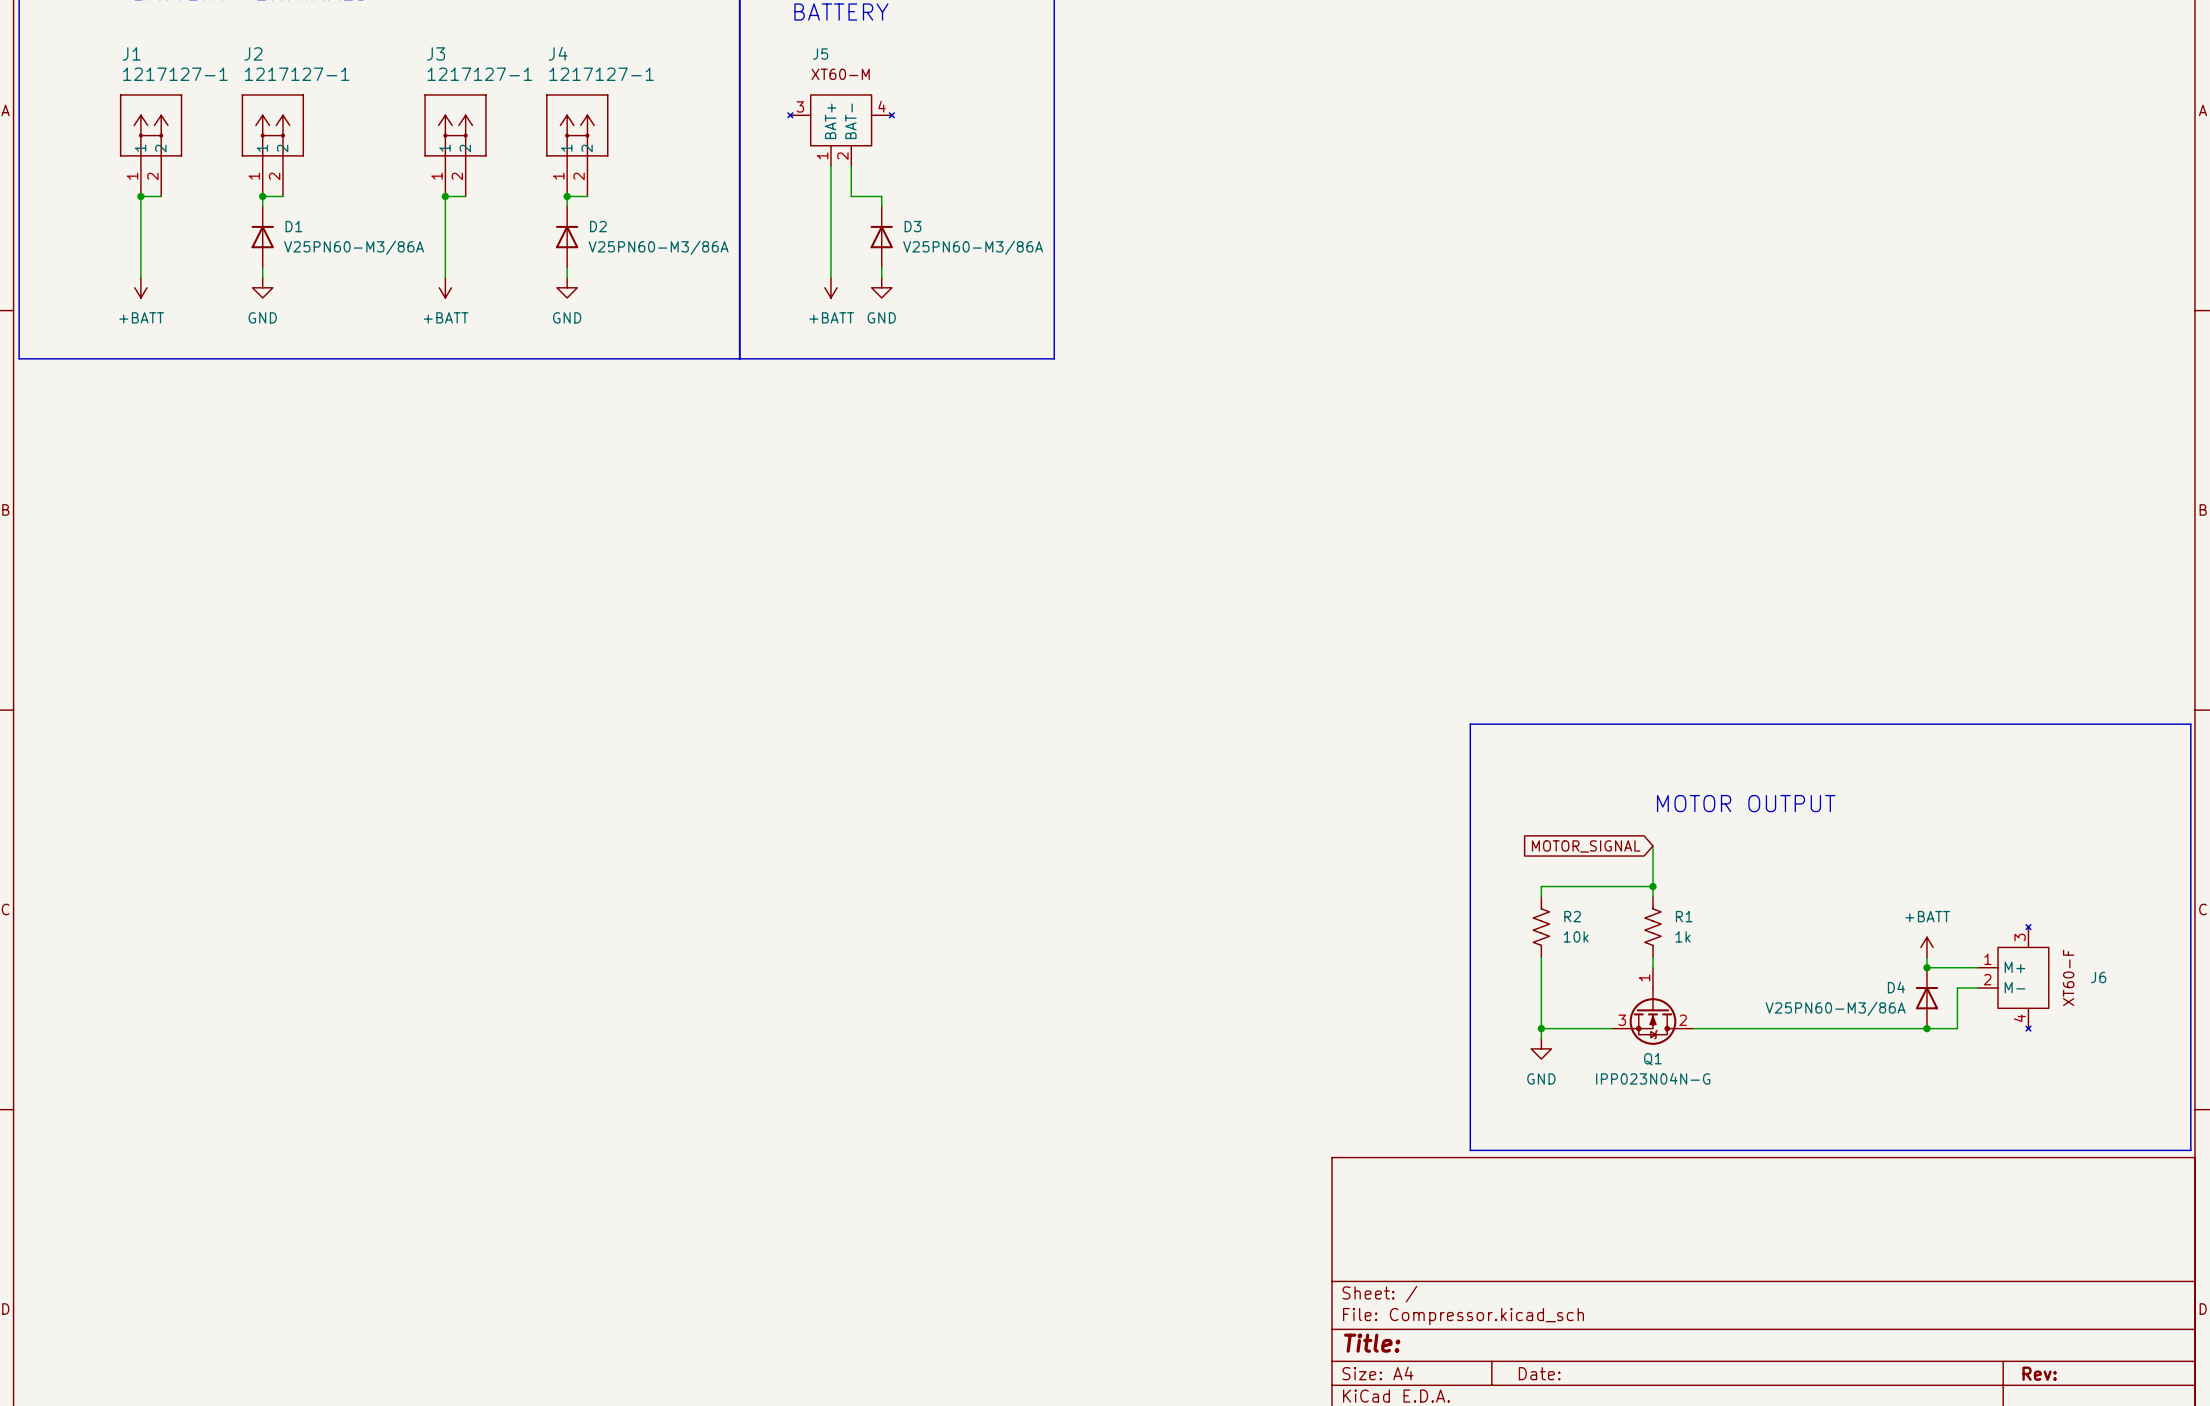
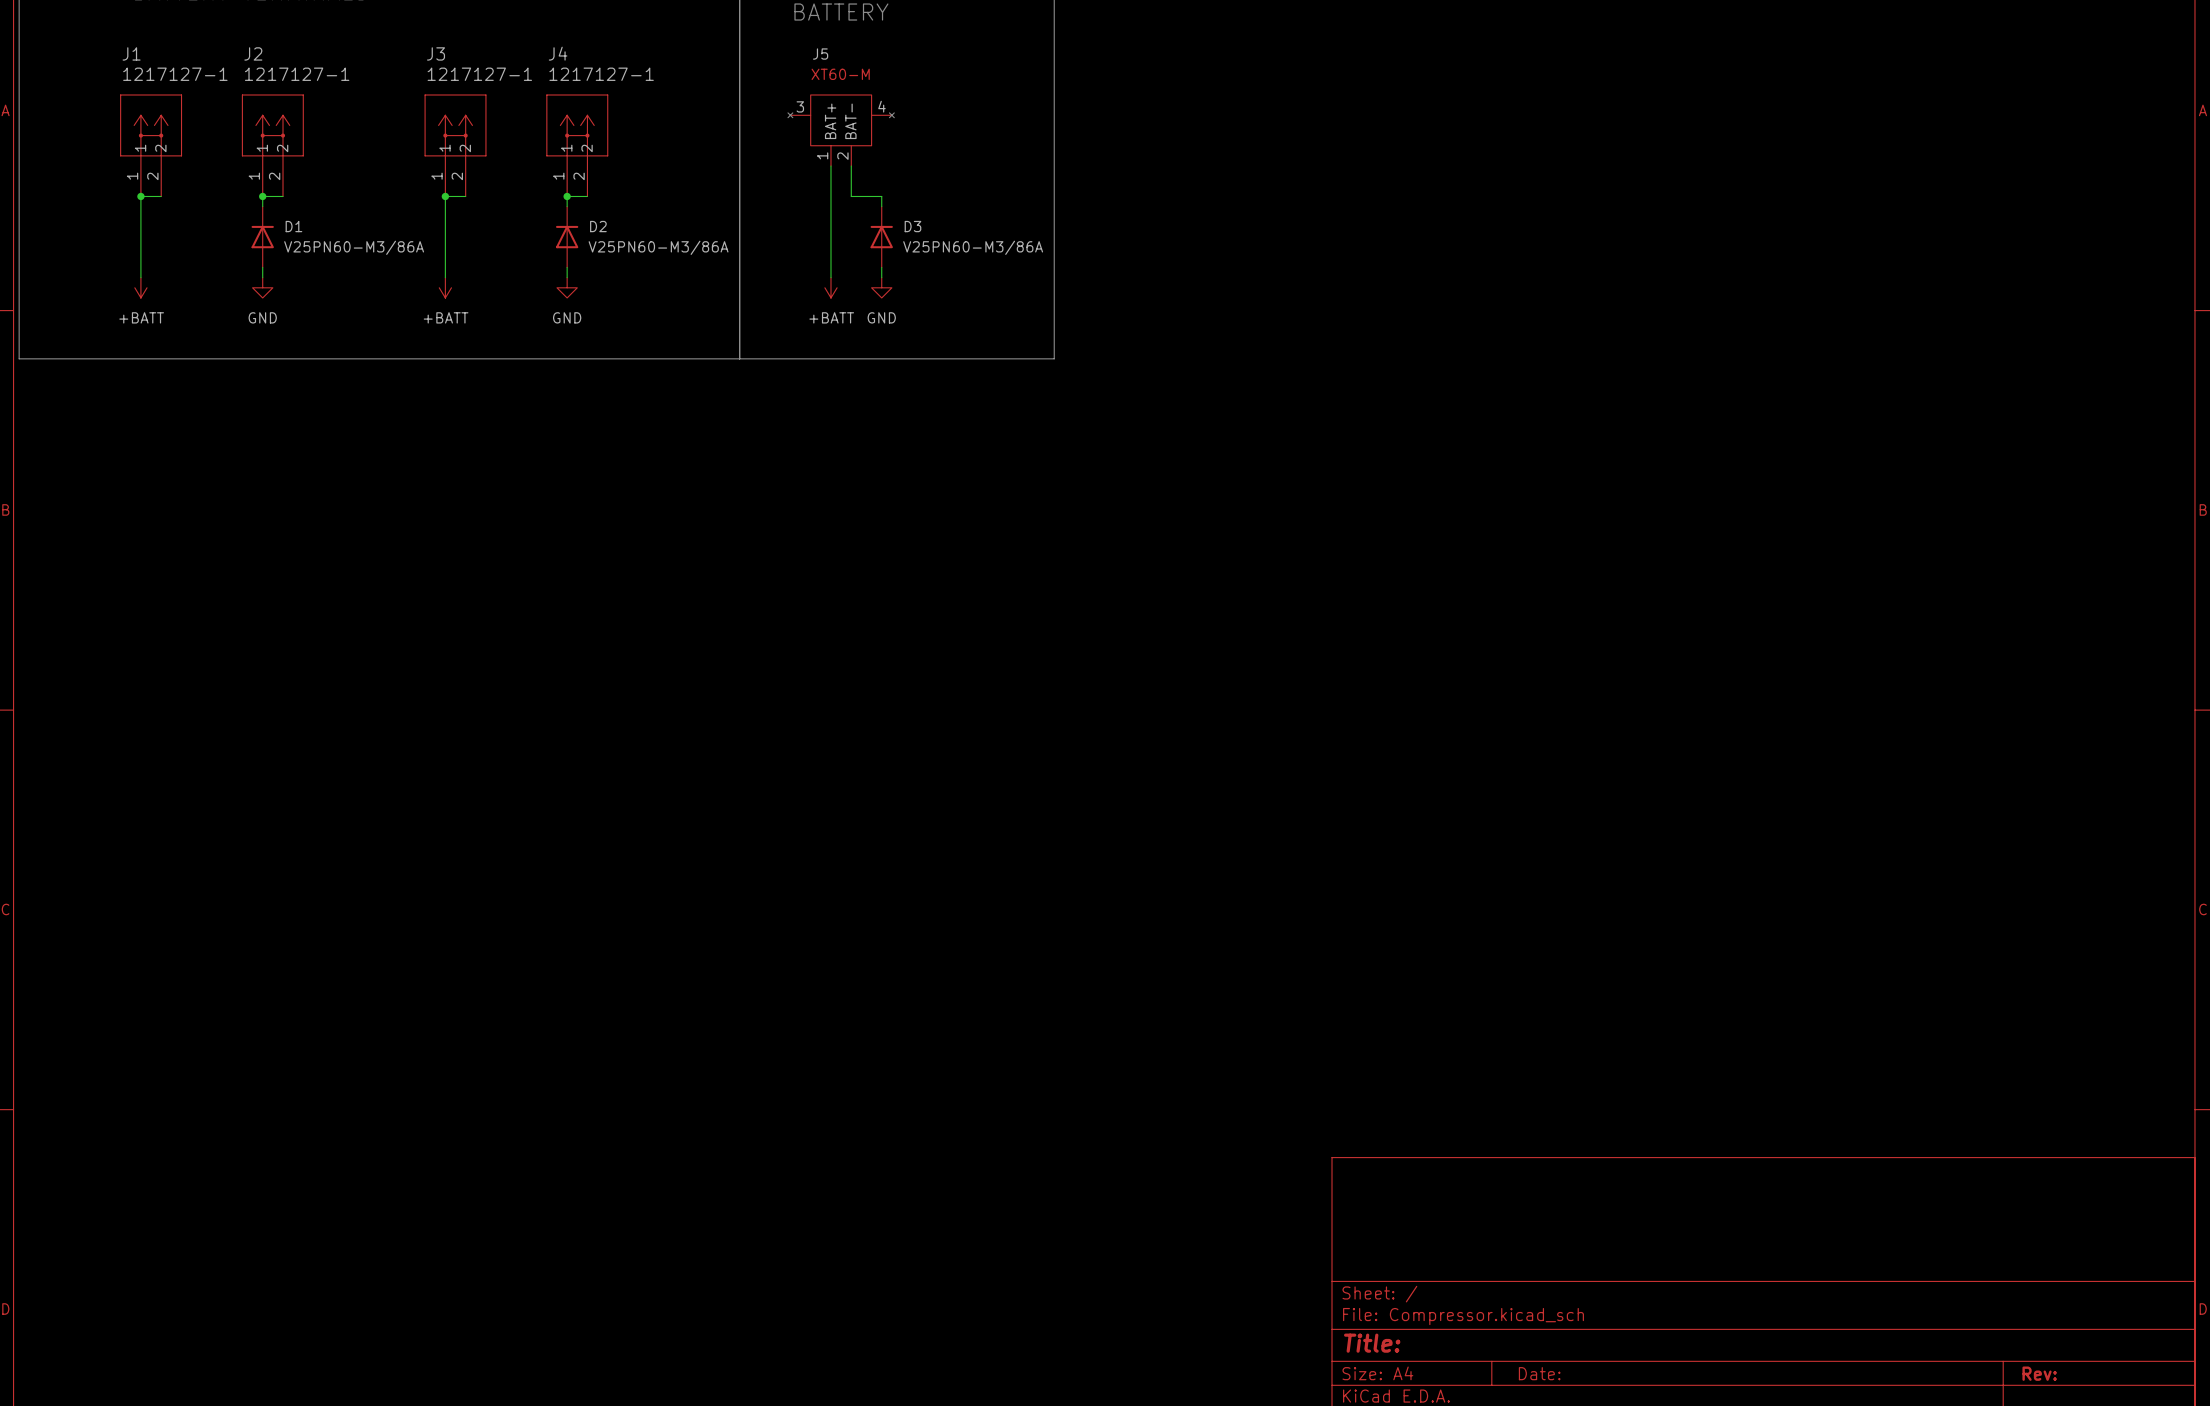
line: (1470, 724) (2190, 724) (2190, 1150) (1470, 1150) (1470, 724) -> none
text: MOTOR OUTPUT (1746, 803) -> none
wire: (1652, 845) (1652, 896) -> none
global label: MOTOR_SIGNAL (1586, 846) -> none
wire: (1652, 886) (1541, 886) (1541, 896) -> none
junction: (1652, 886) -> none
R2: 10k (1541, 927) -> none
R1: 1k (1652, 927) -> none
power symbol: +BATT (1926, 947) -> none
wire: (1541, 957) (1541, 1038) -> none
wire: (1652, 957) (1652, 967) -> none
wire: (1926, 957) (1926, 967) (1977, 967) -> none
junction: (1926, 967) -> none
J6: (2013, 977) -> none
wire: (1977, 988) (1957, 988) (1957, 1028) (1693, 1028) -> none
D4: V25PN60-M3/86A (1926, 998) -> none
Q1: IPP023N04N-G (1652, 1006) -> none
wire: (1541, 1028) (1612, 1028) -> none
junction: (1541, 1028) -> none
junction: (1926, 1028) -> none
power symbol: GND (1541, 1048) -> none

